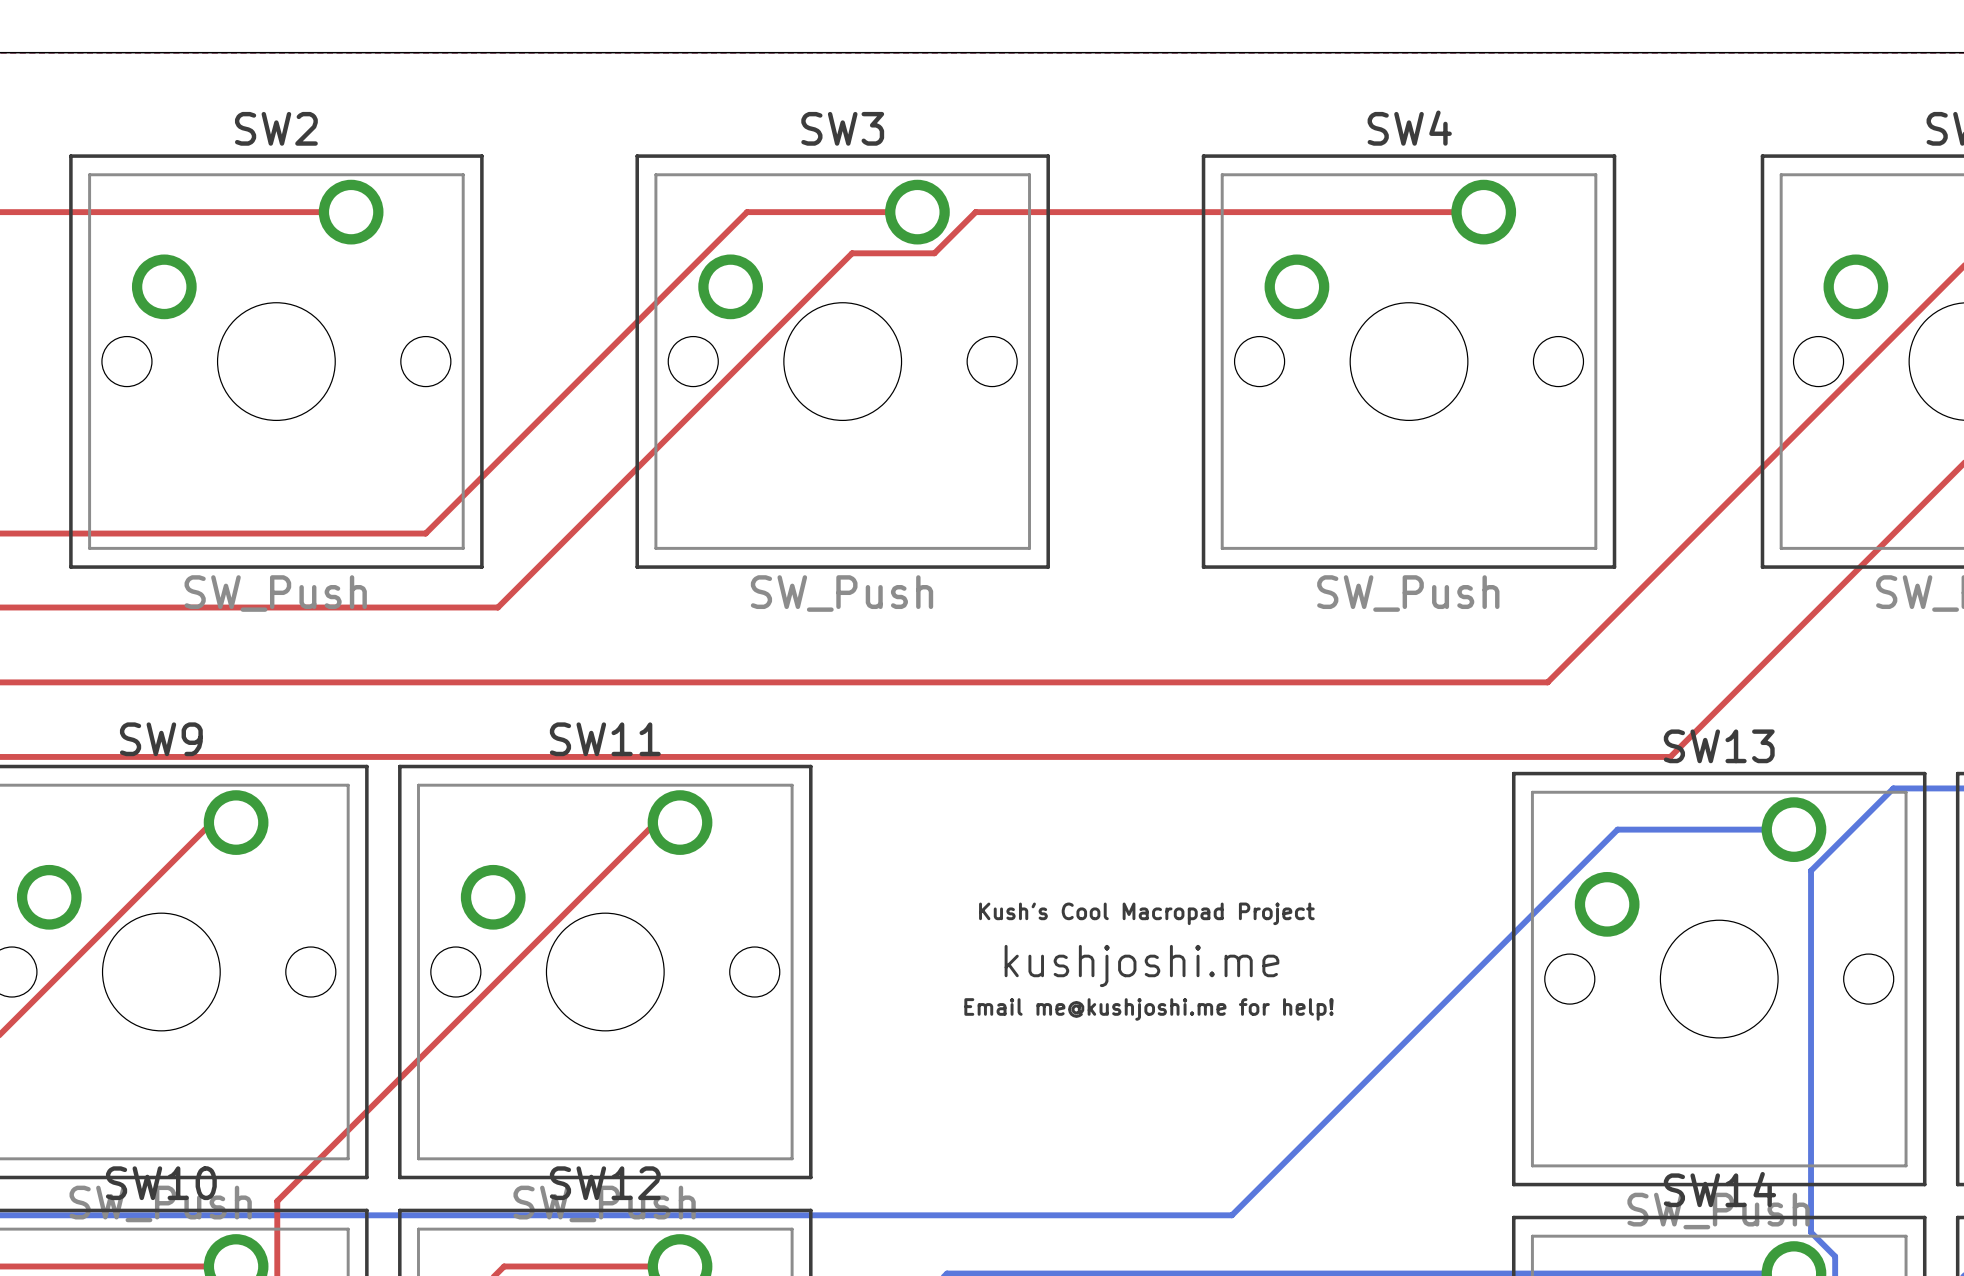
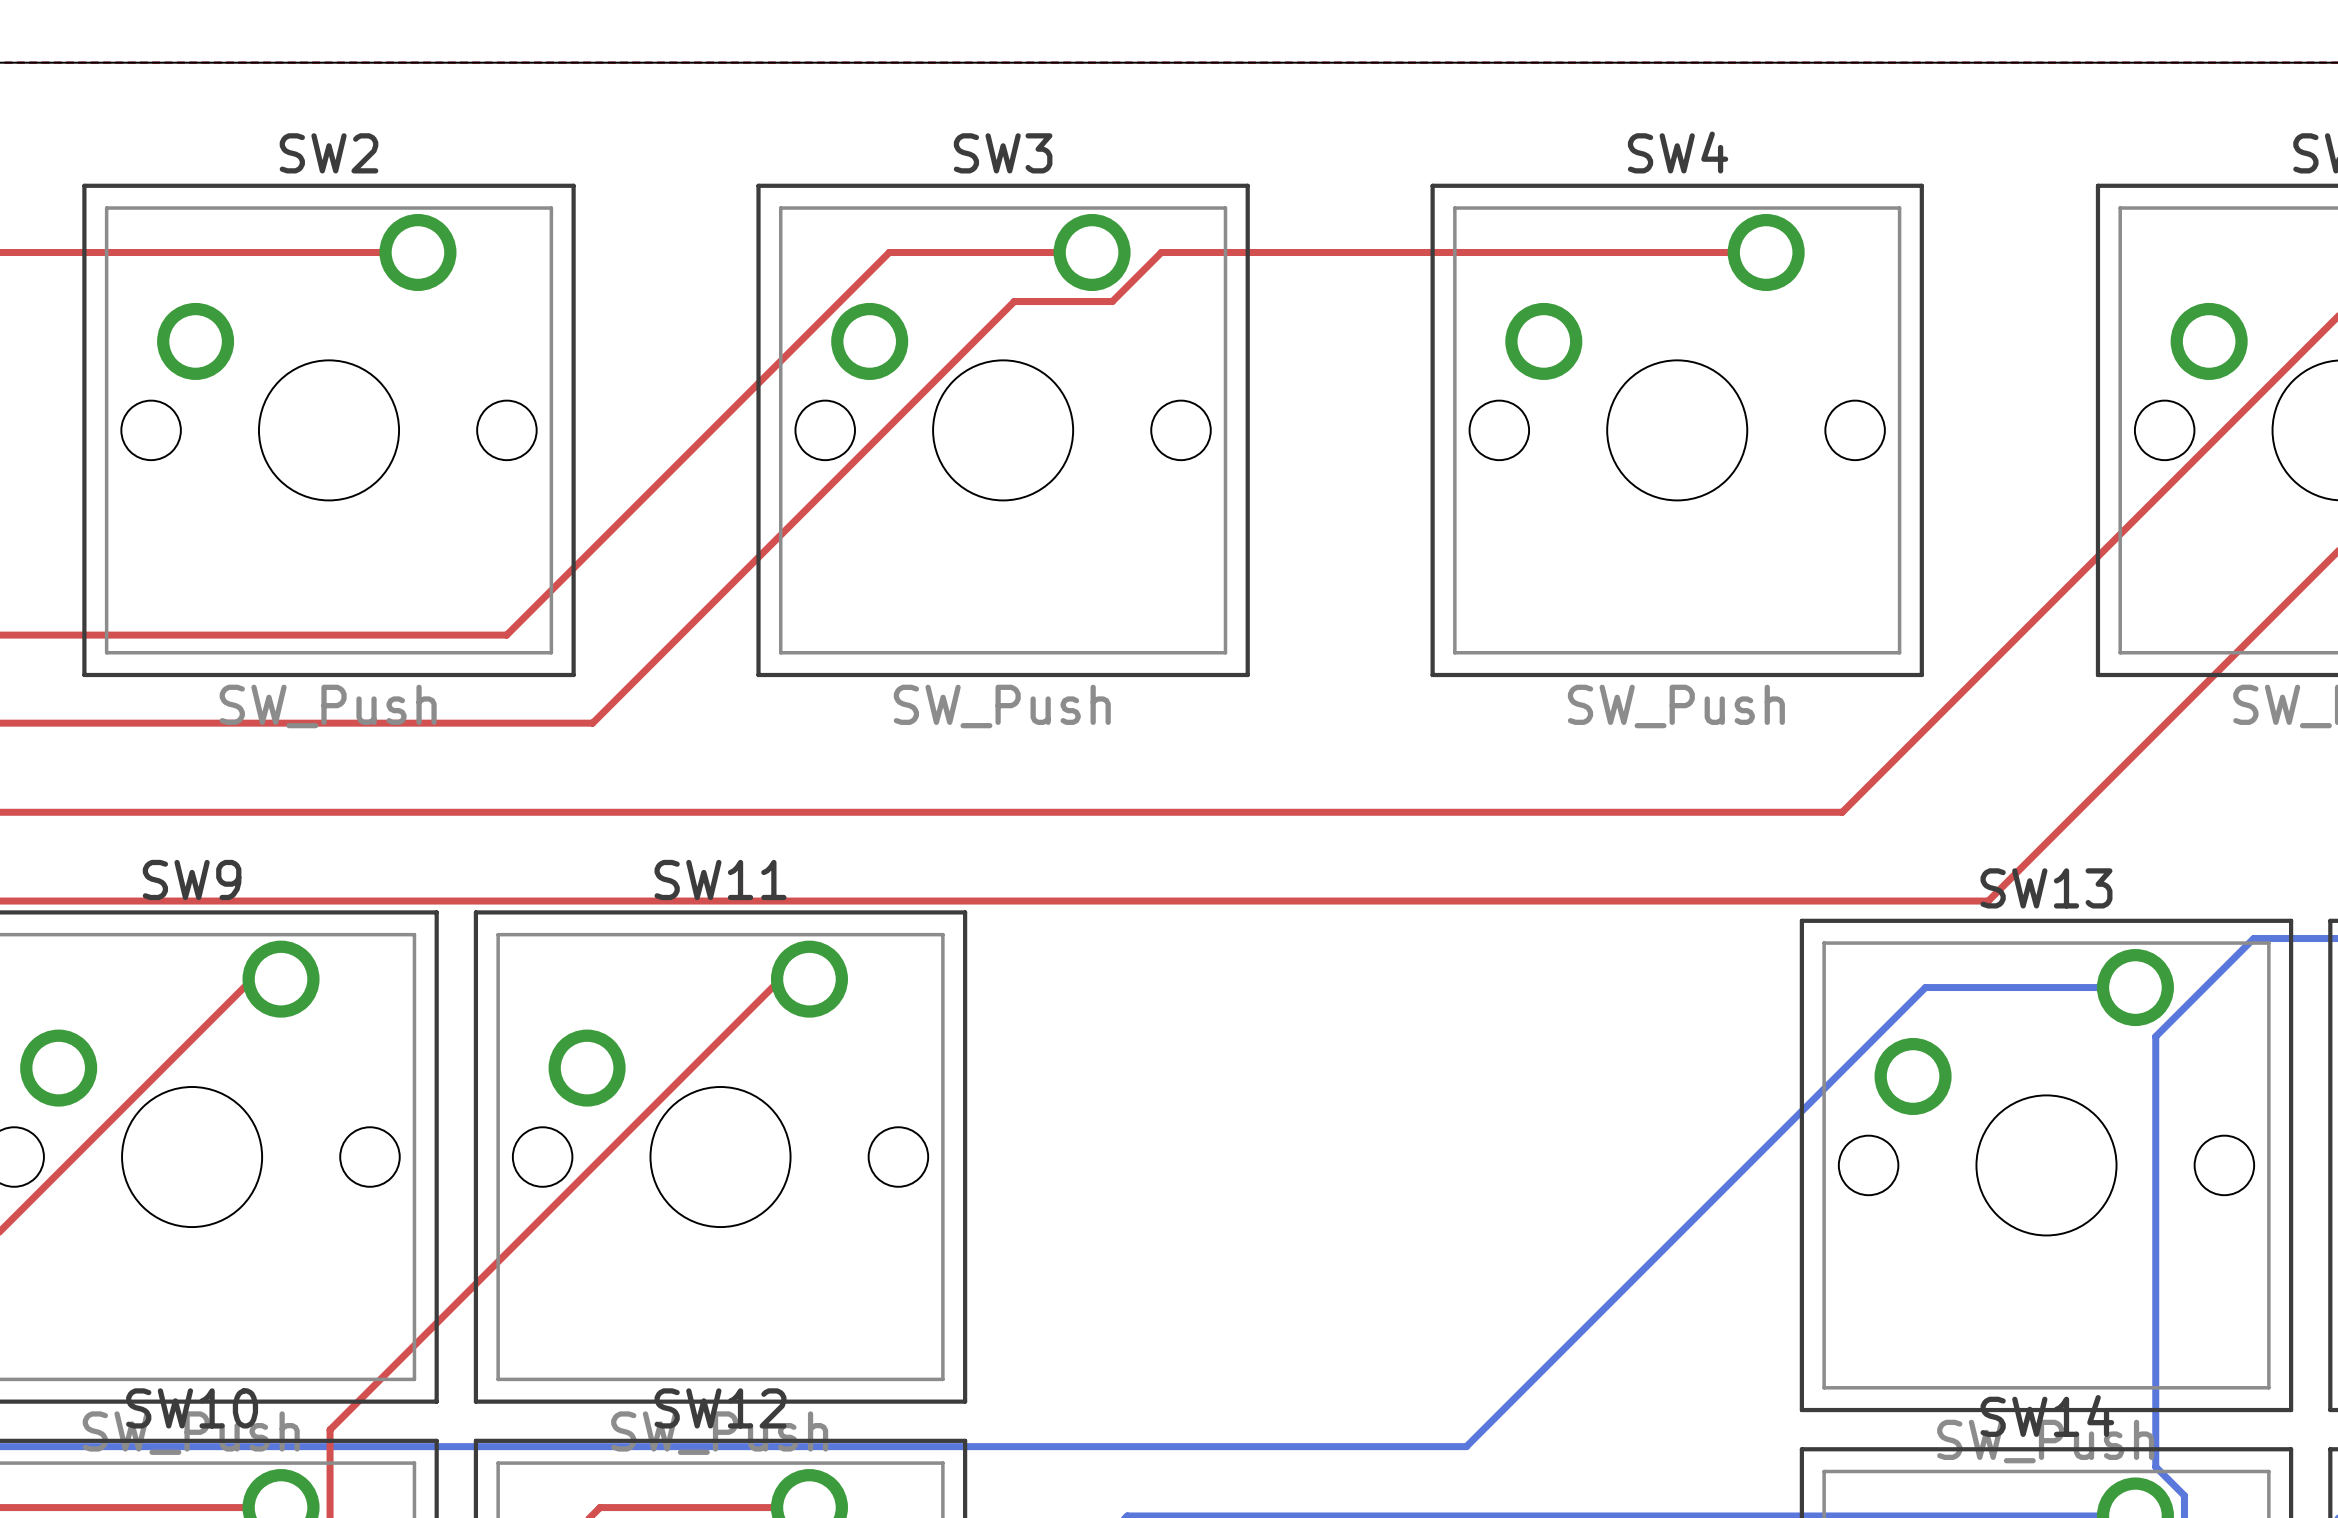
text: Kush's Cool Macropad Project (1146, 913) -> none
text: kushjoshi.me (1141, 965) -> none
text: Email me@kushjoshi.me for help! (1148, 1009) -> none

